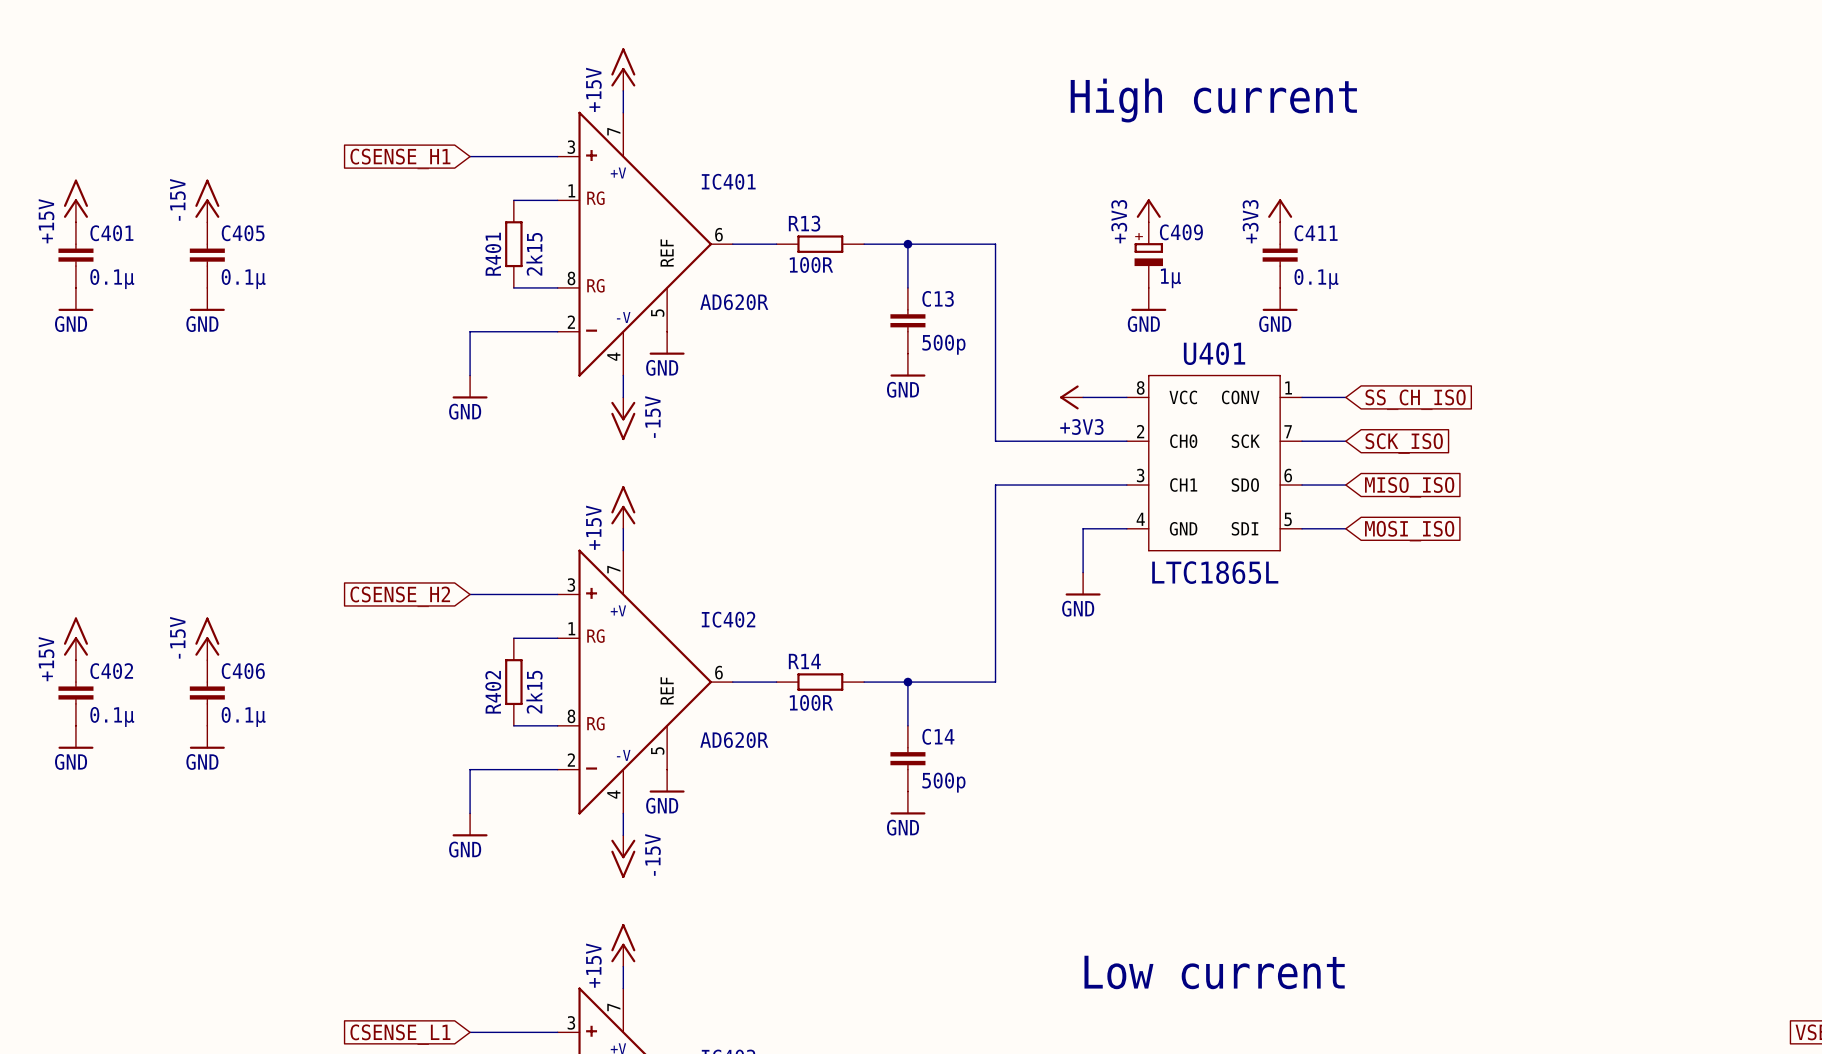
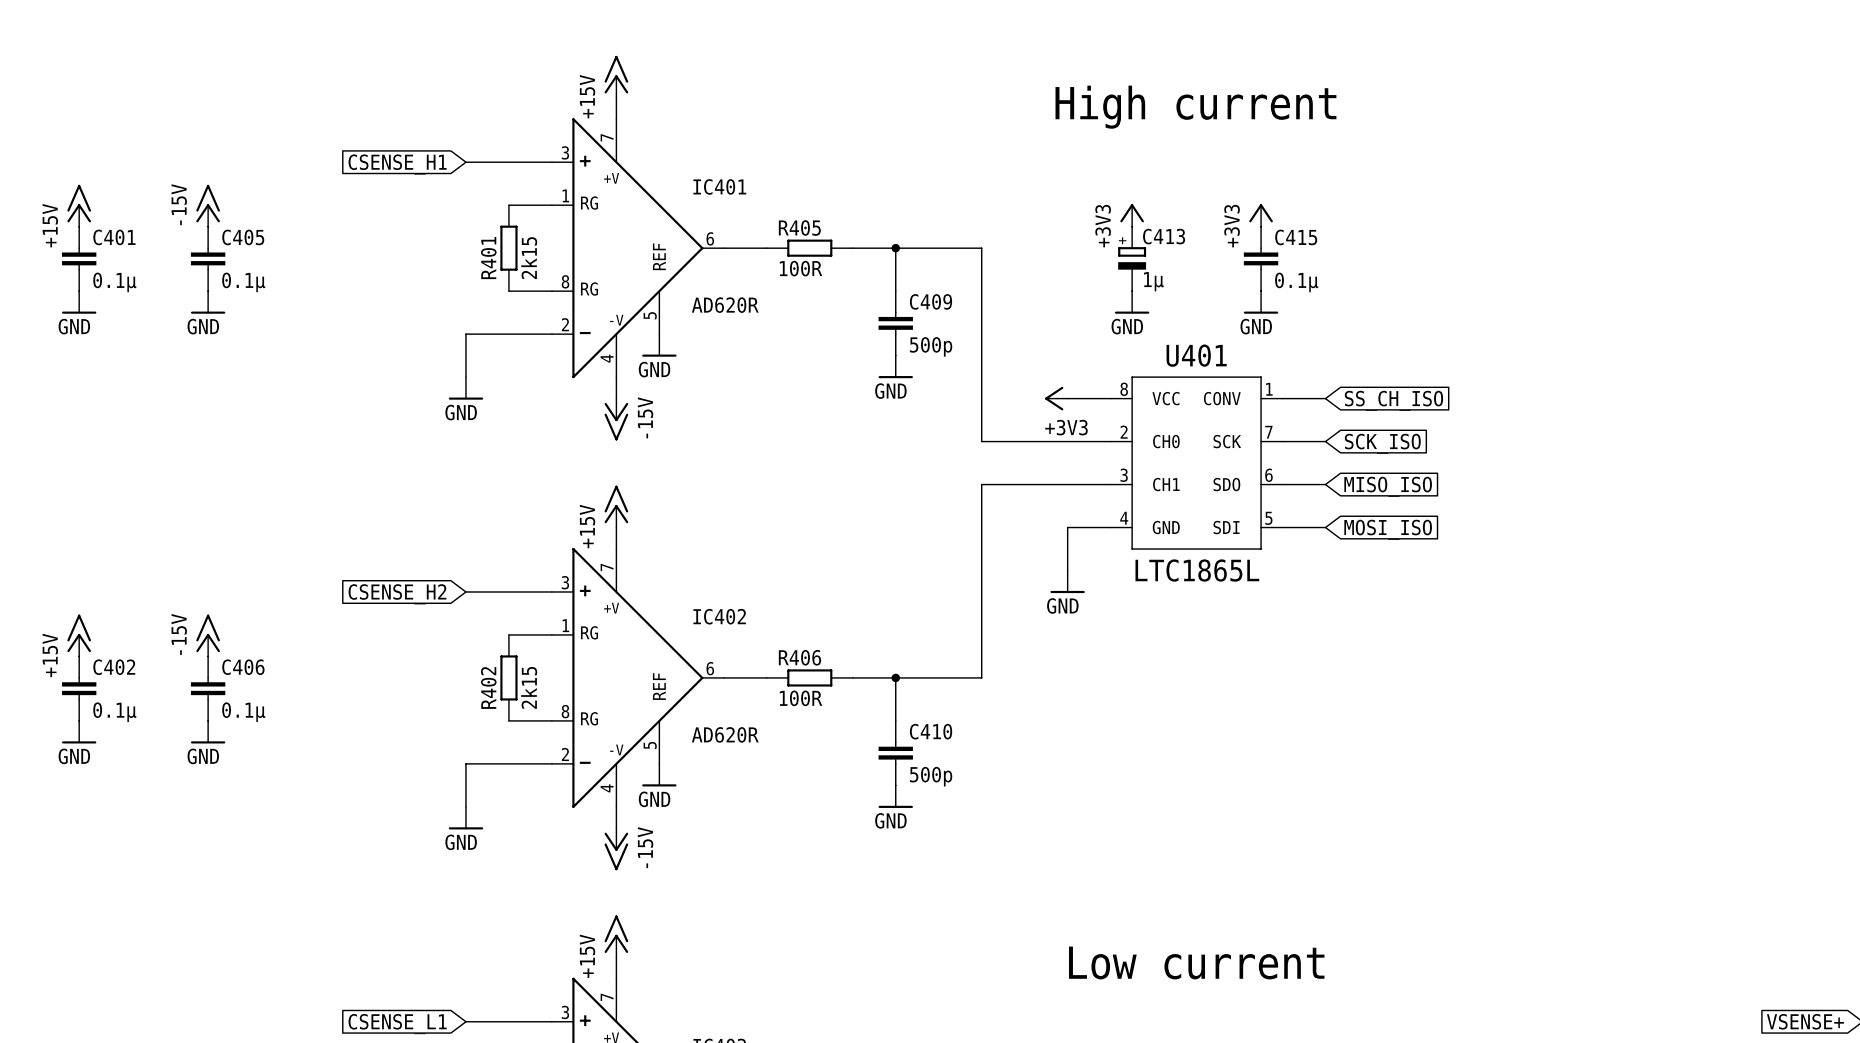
R13 name: R13 (804, 223) -> R405 (799, 227)
C409 name: C409 (1181, 232) -> C413 (1164, 236)
C411 name: C411 (1316, 233) -> C415 (1296, 237)
C13 name: C13 (938, 298) -> C409 (931, 301)
R14 name: R14 (804, 661) -> R406 (799, 657)
C14 name: C14 (938, 736) -> C410 (931, 731)

